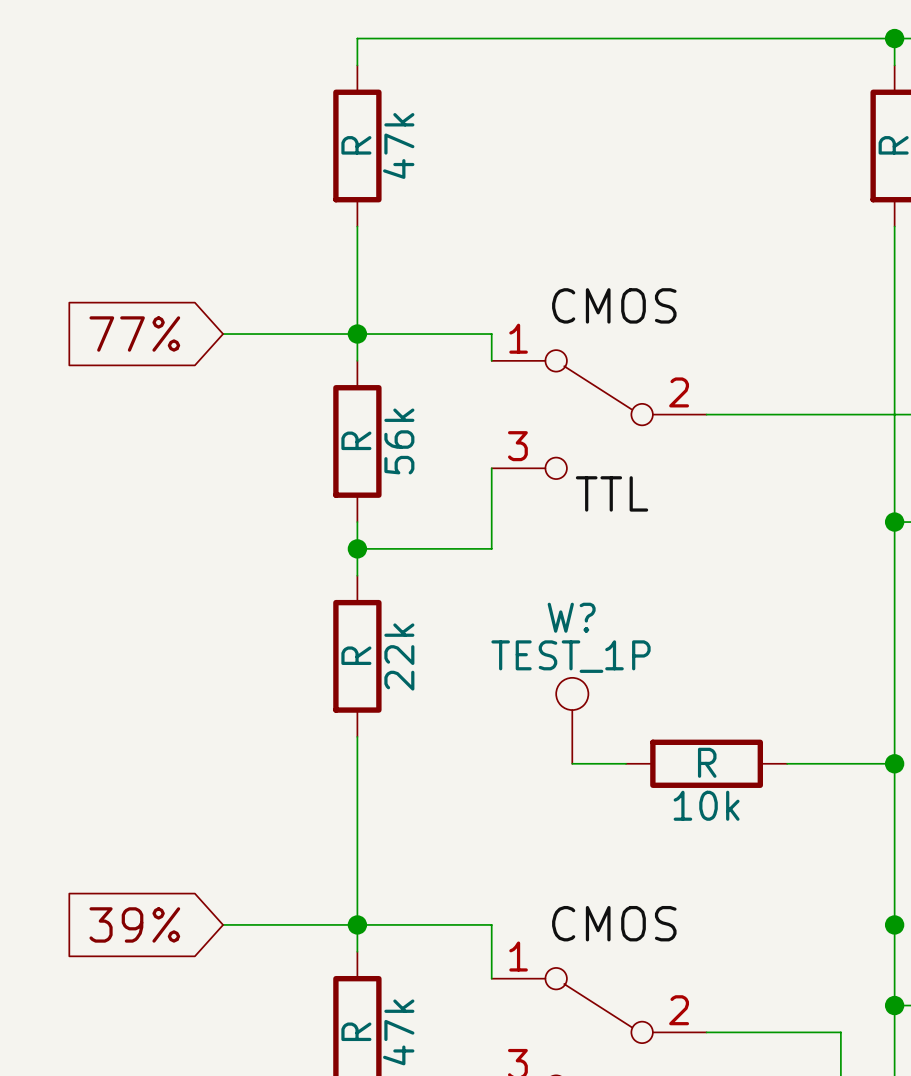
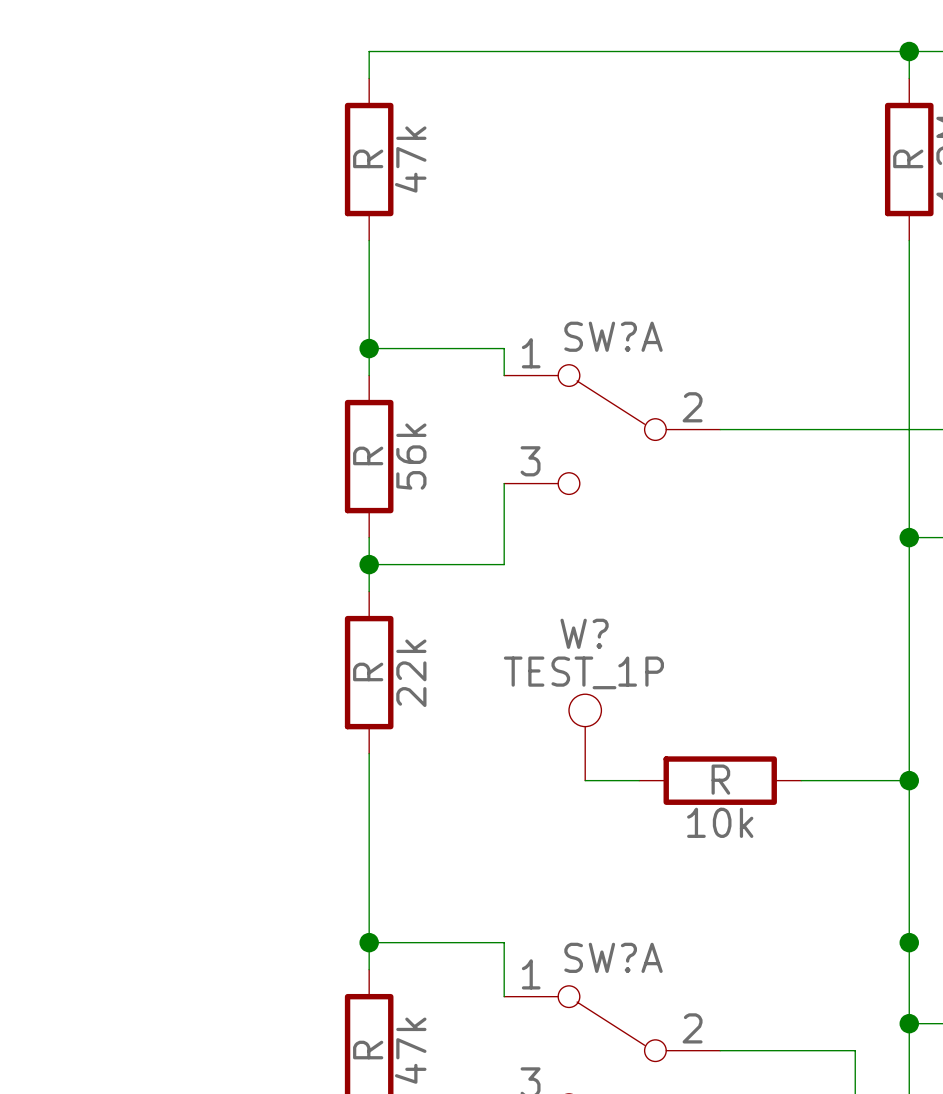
label: CMOS (614, 305) -> none
SW?A name: none -> SW?A (613, 336)
global label: 77% (134, 334) -> none
wire: (223, 334) (357, 334) -> none
label: TTL (612, 493) -> none
label: CMOS (614, 923) -> none
global label: 39% (134, 924) -> none
wire: (223, 924) (357, 924) -> none
SW?A name: none -> SW?A (613, 957)

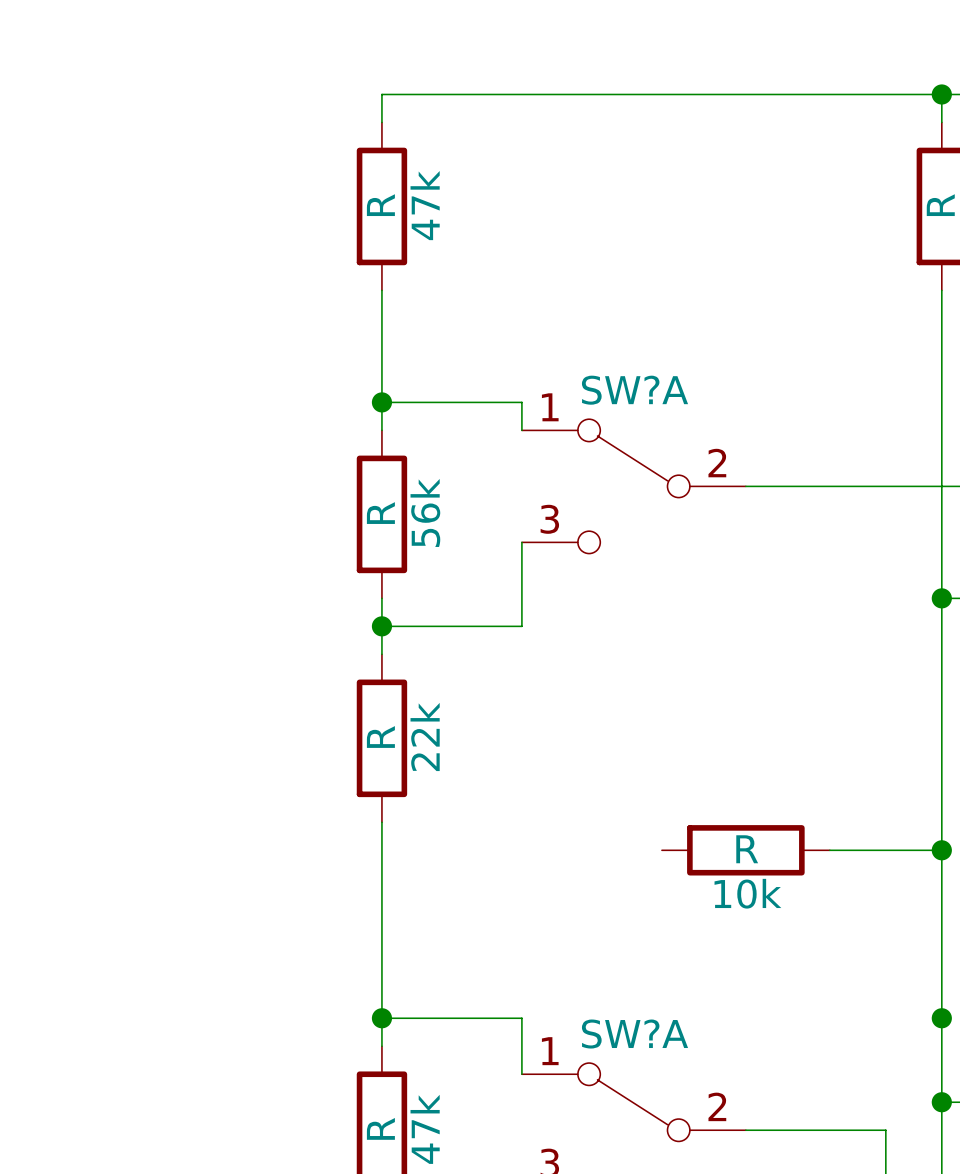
W?: TEST_1P (585, 737) -> none
wire: (585, 780) (639, 780) -> none

